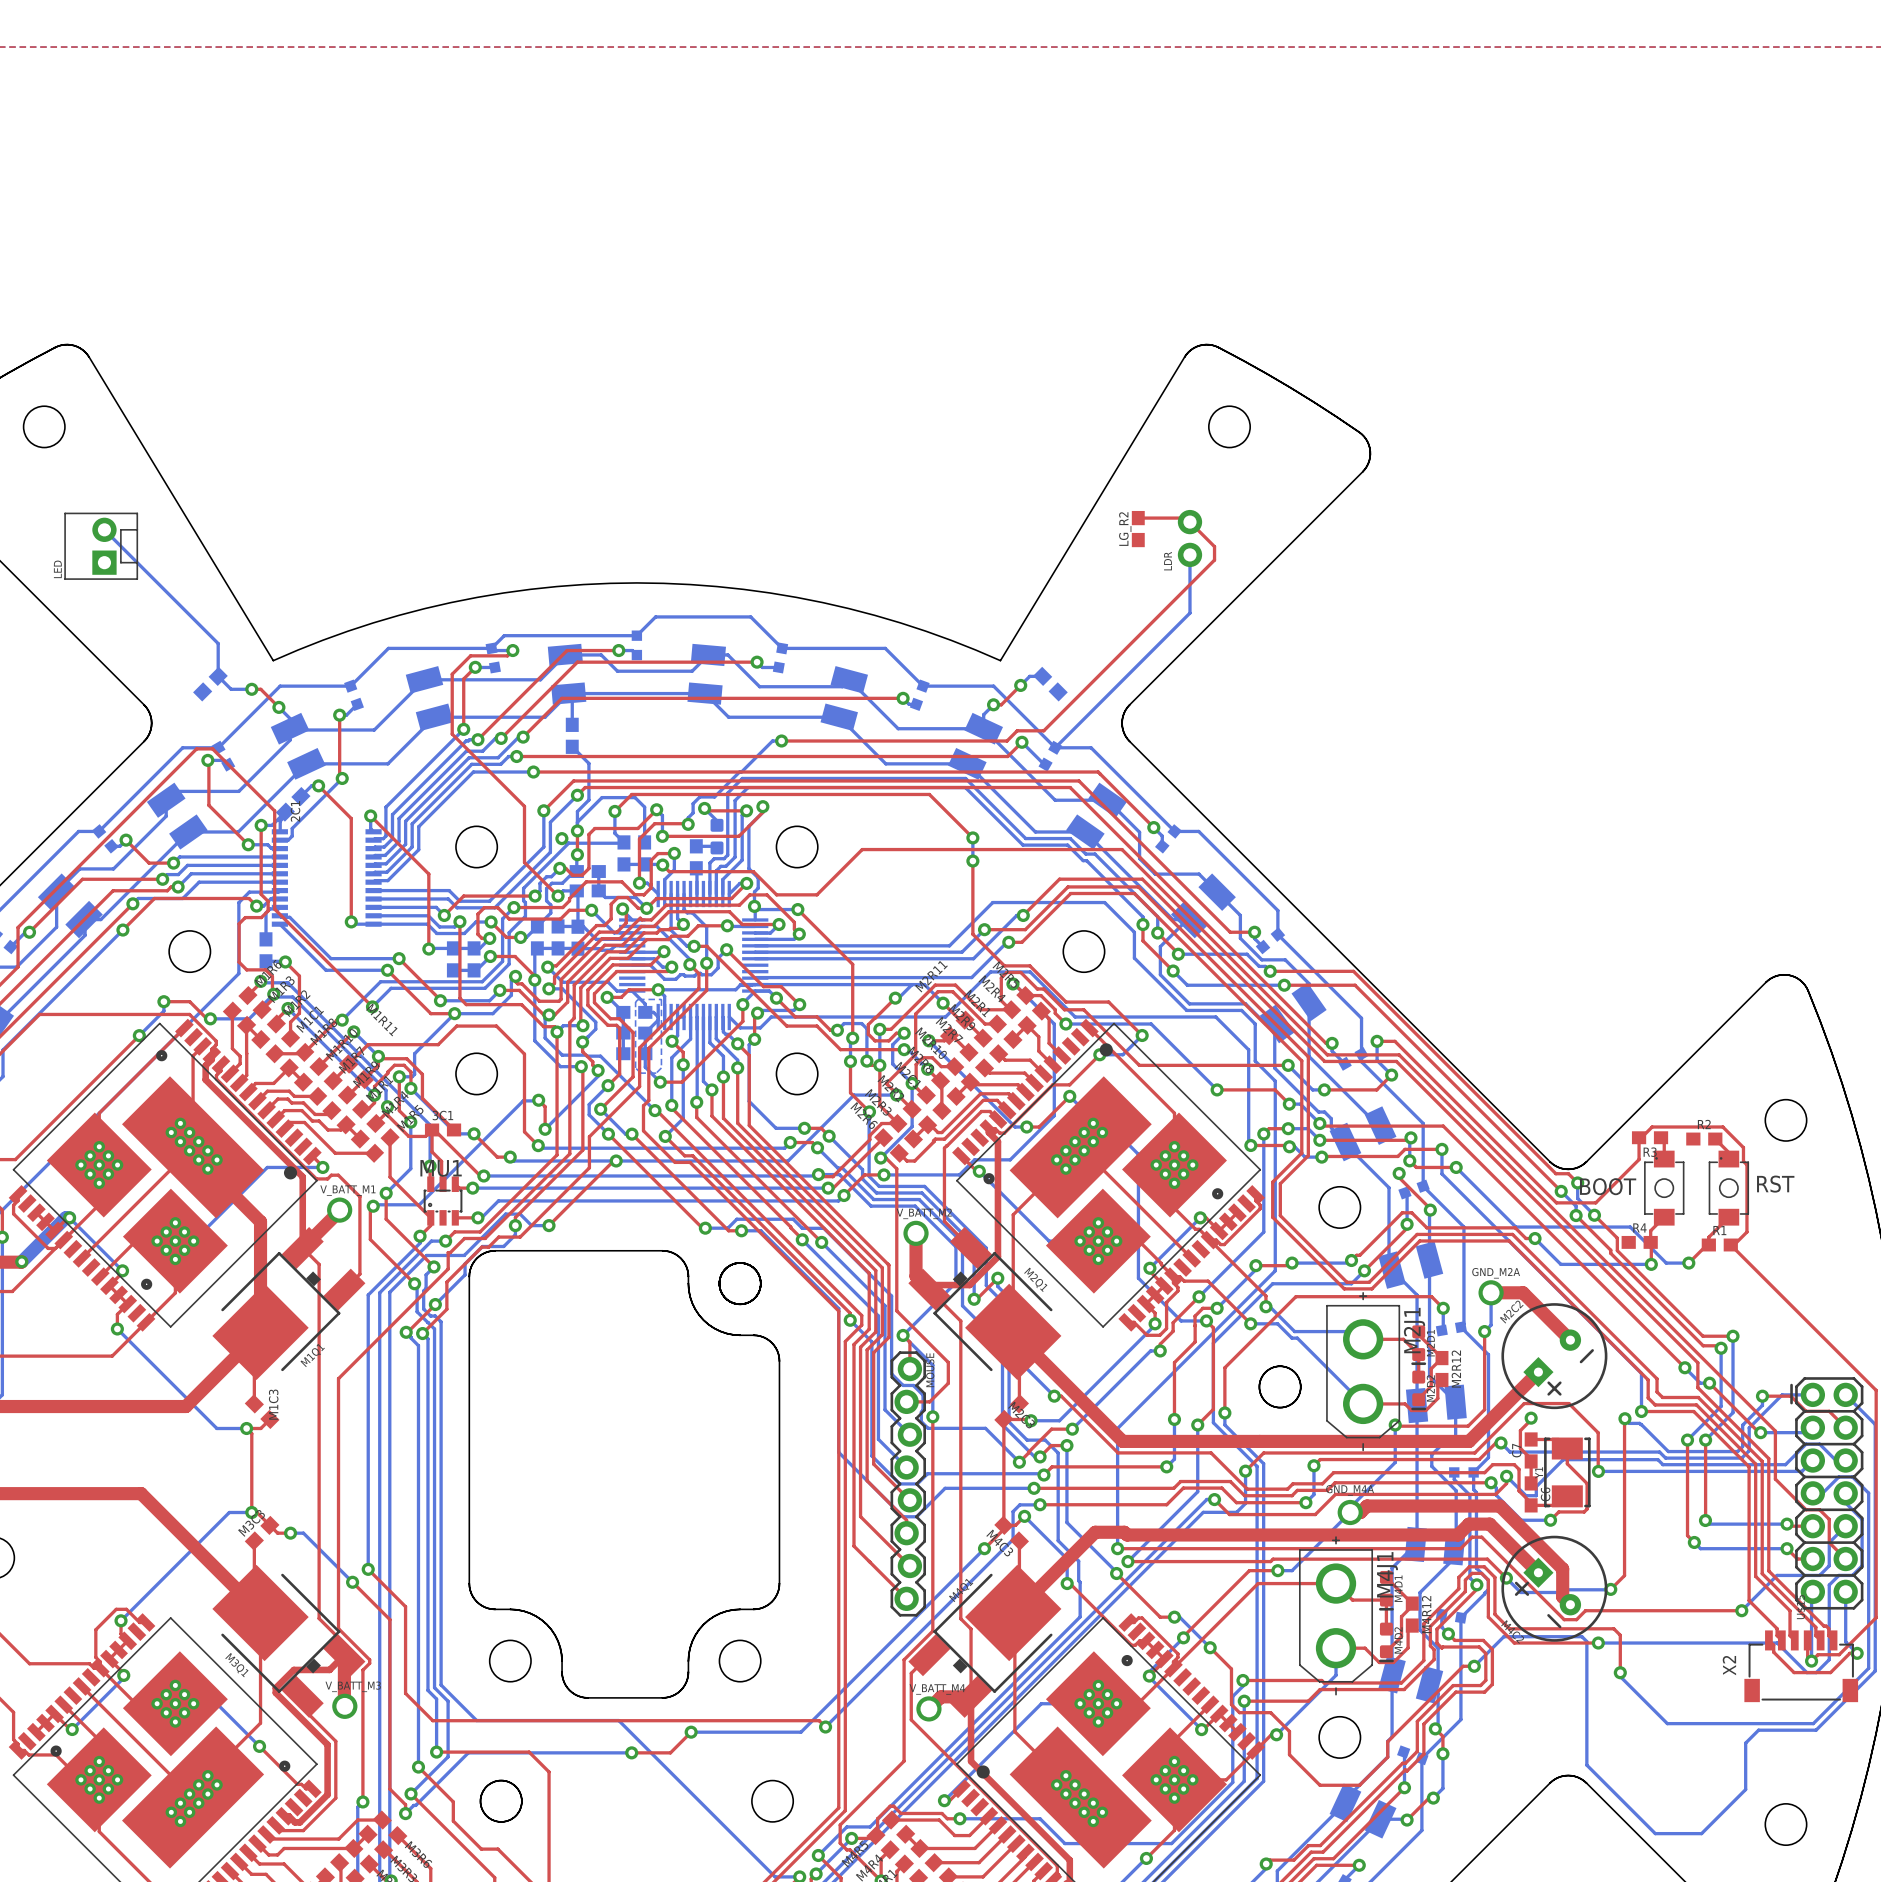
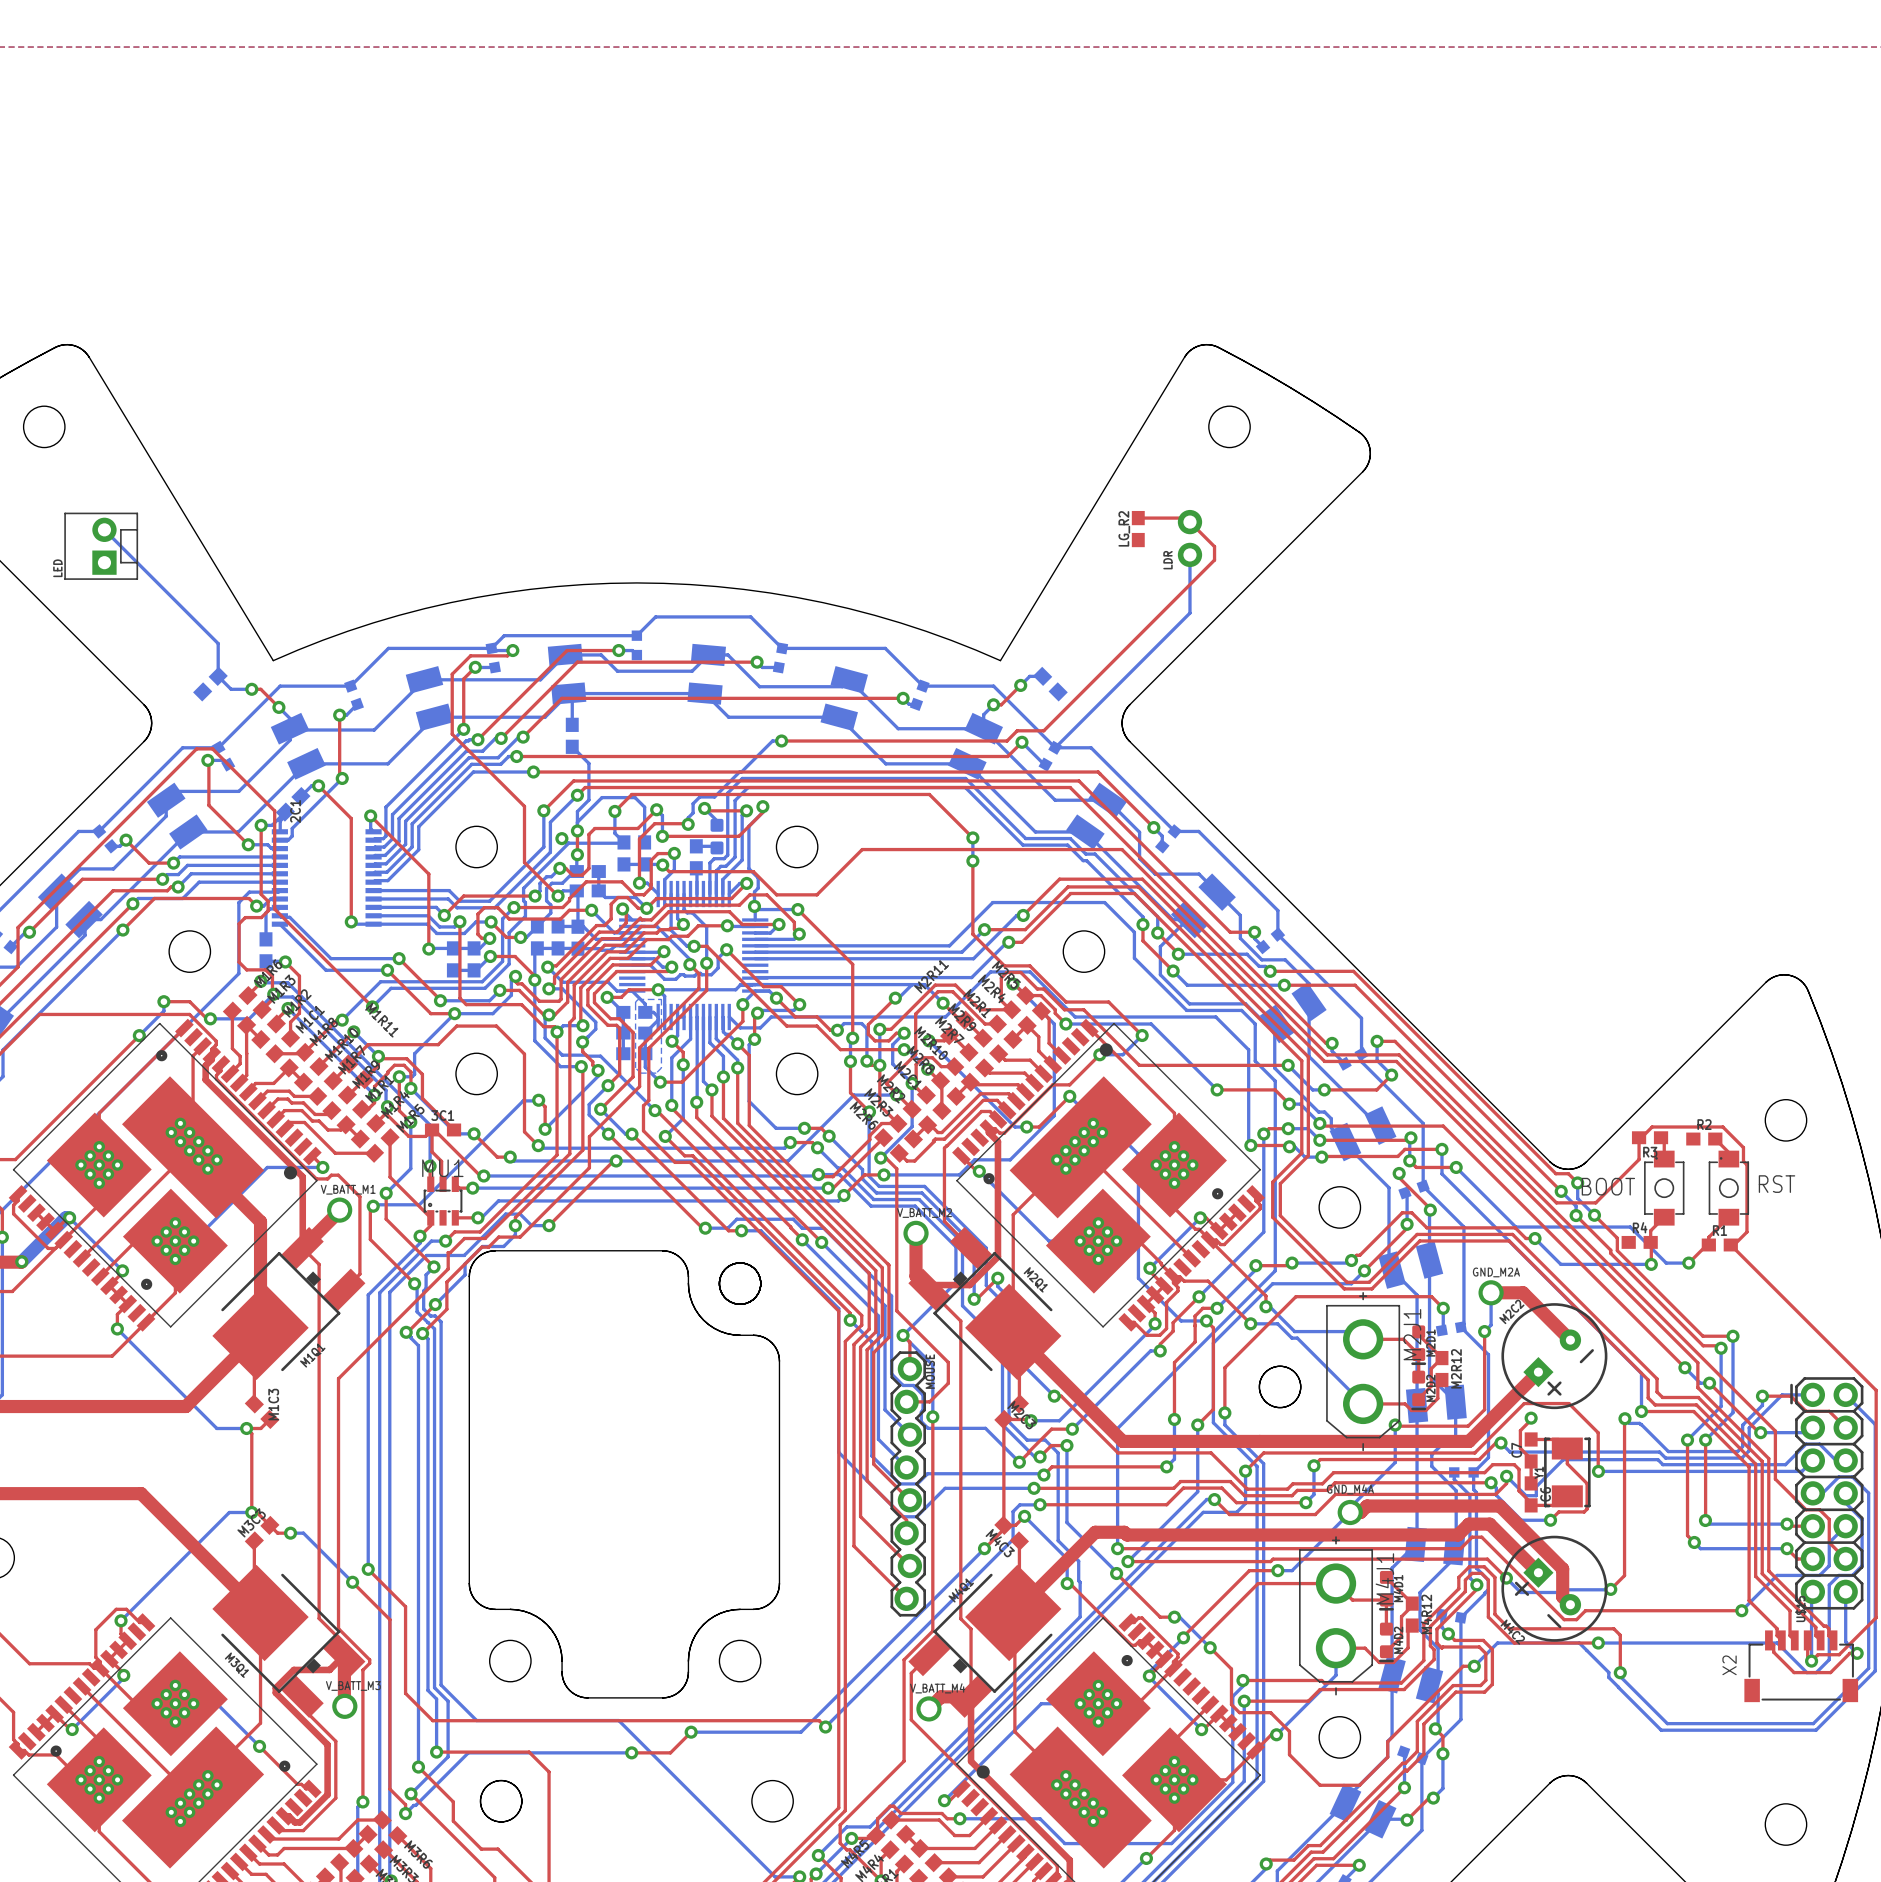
bottom track: (1497, 1643) (1503, 1636) (1581, 1636) (1586, 1641) (1586, 1765) (1655, 1833) (1701, 1833) (1745, 1789) (1745, 1743) (1758, 1730) -> (1497, 1643) (1579, 1643) (1608, 1672) (1608, 1677) (1661, 1730) (1758, 1730)

